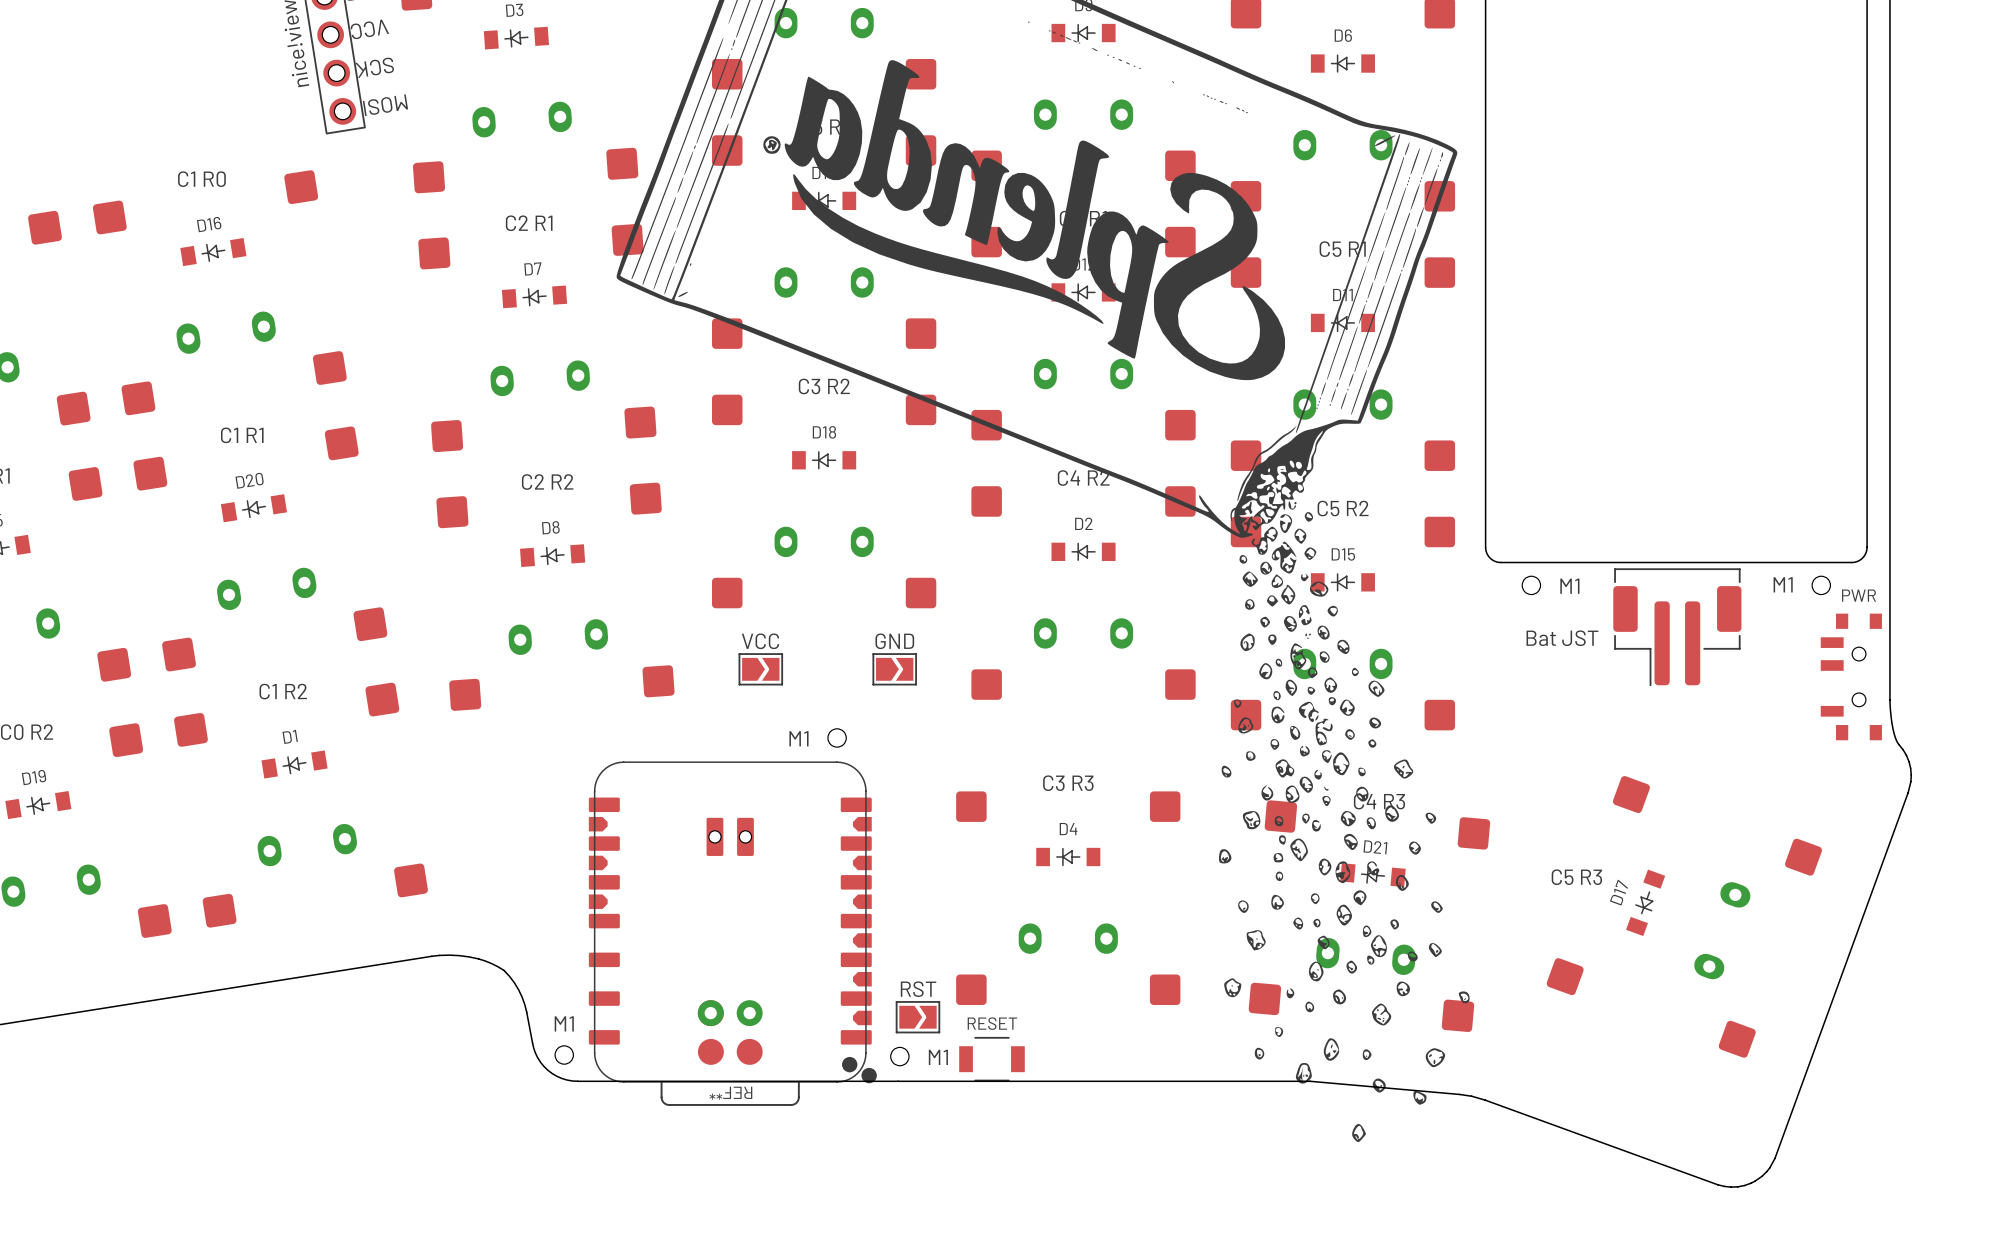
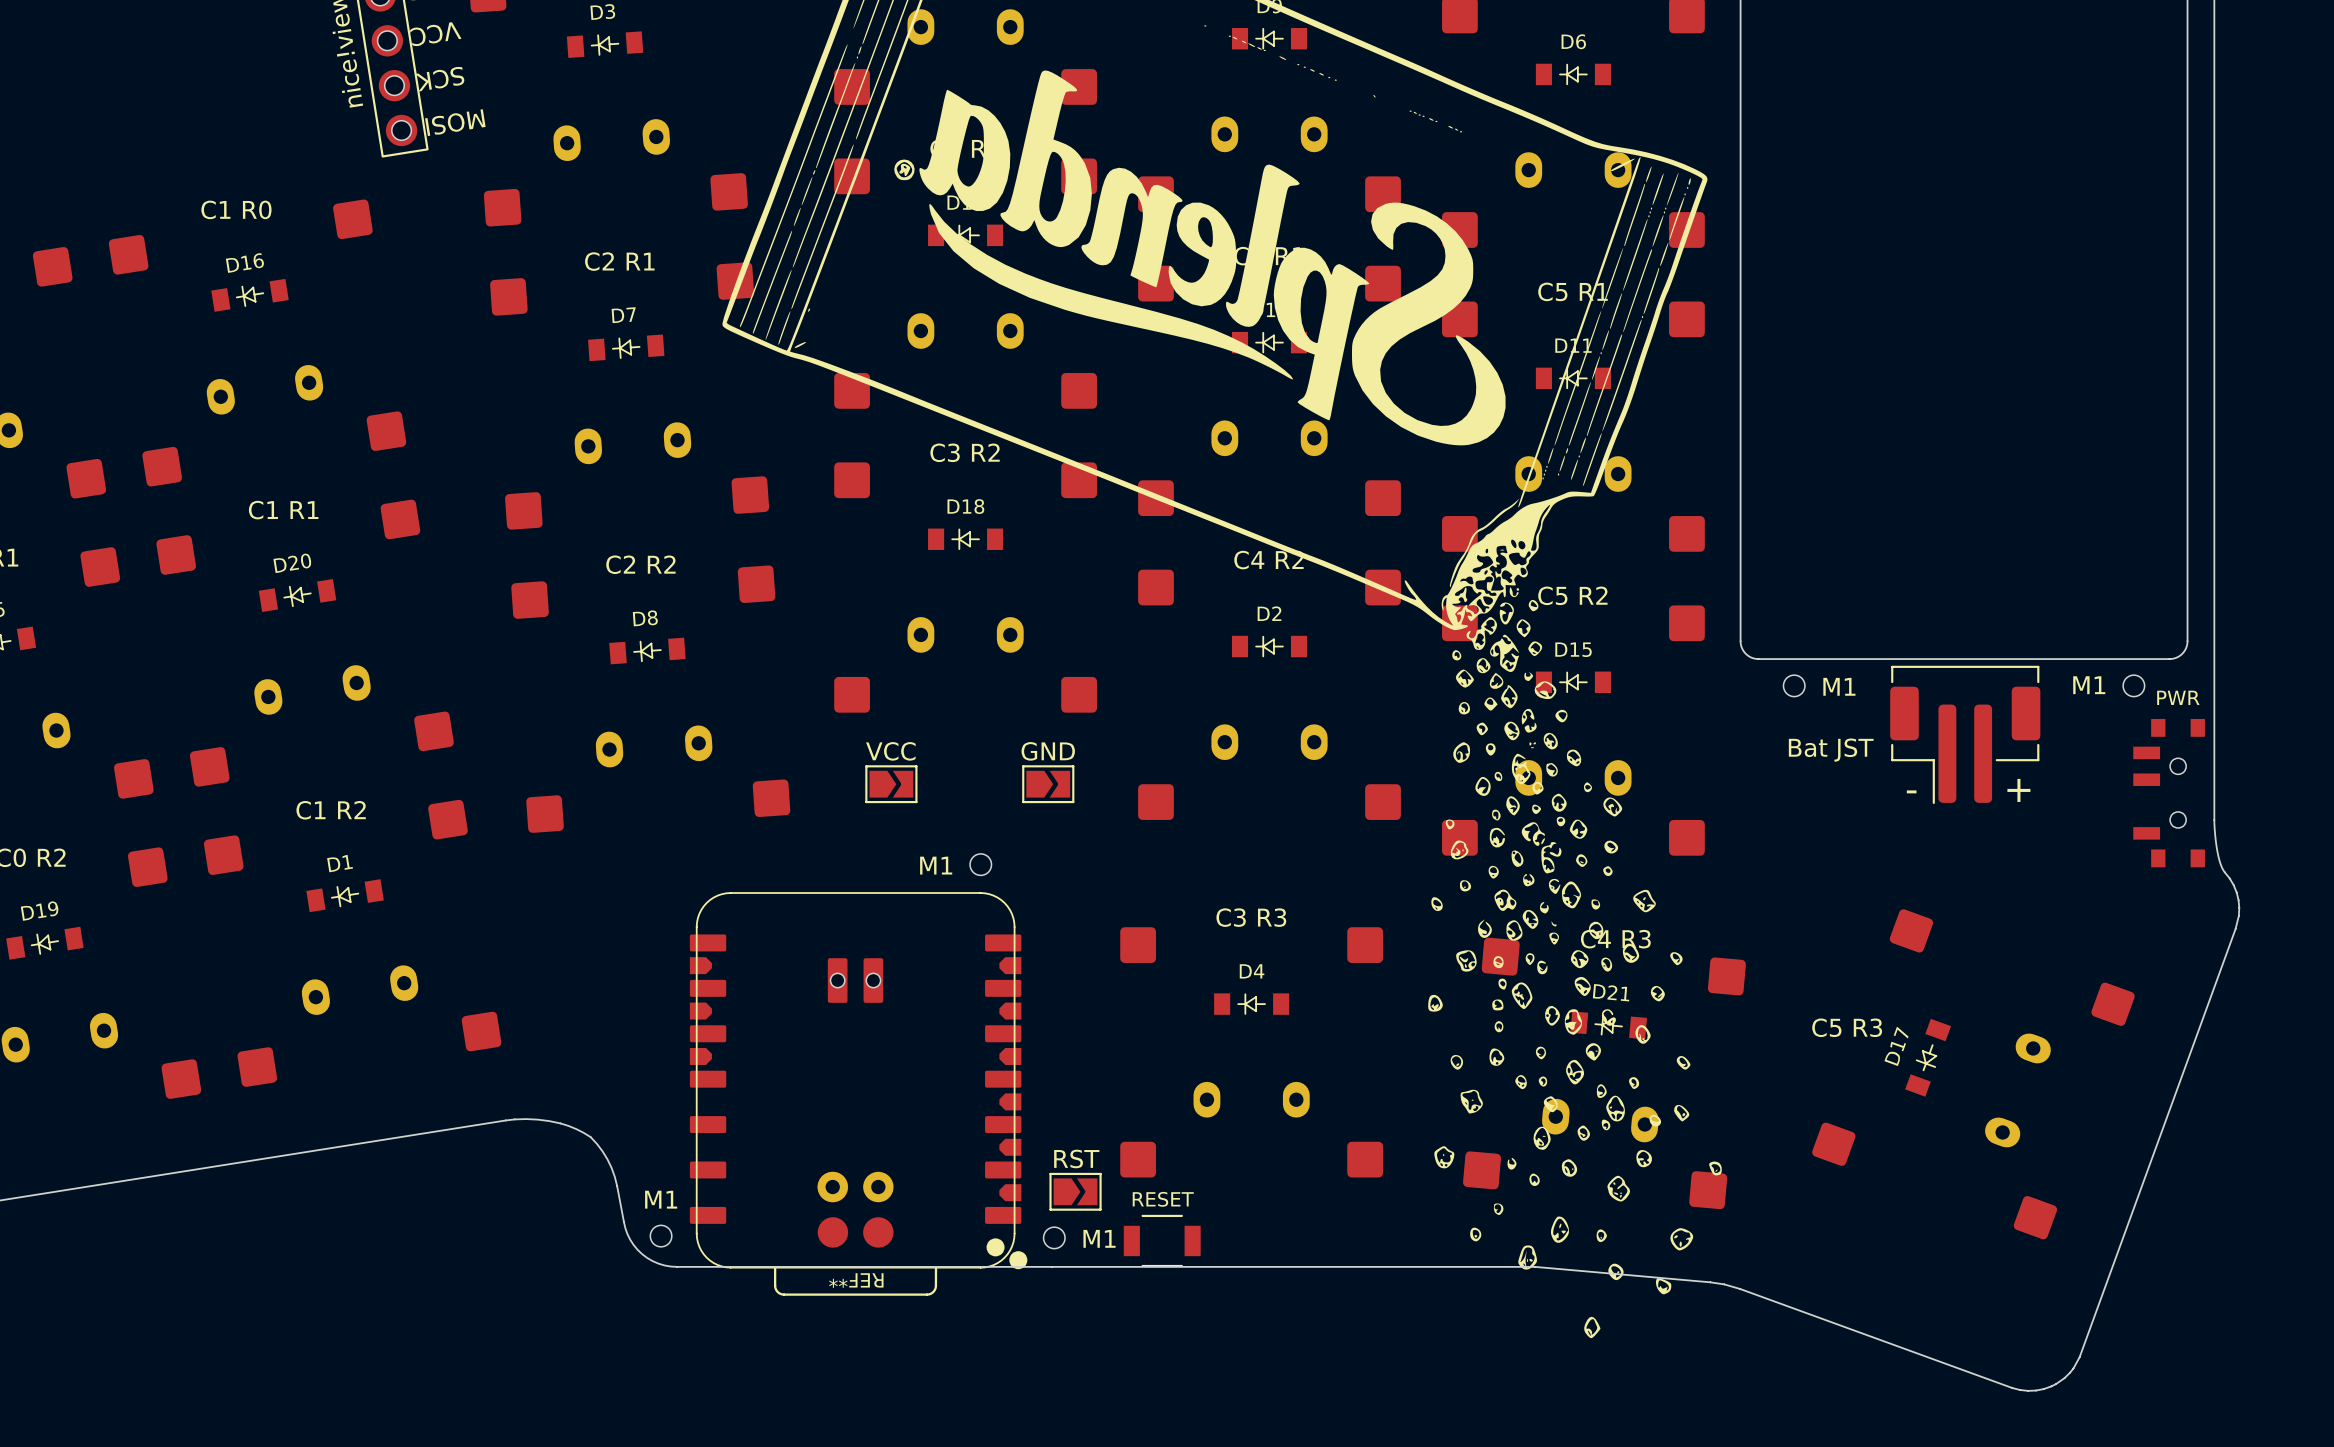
text: none -> - (1911, 791)
text: none -> + (2018, 790)

